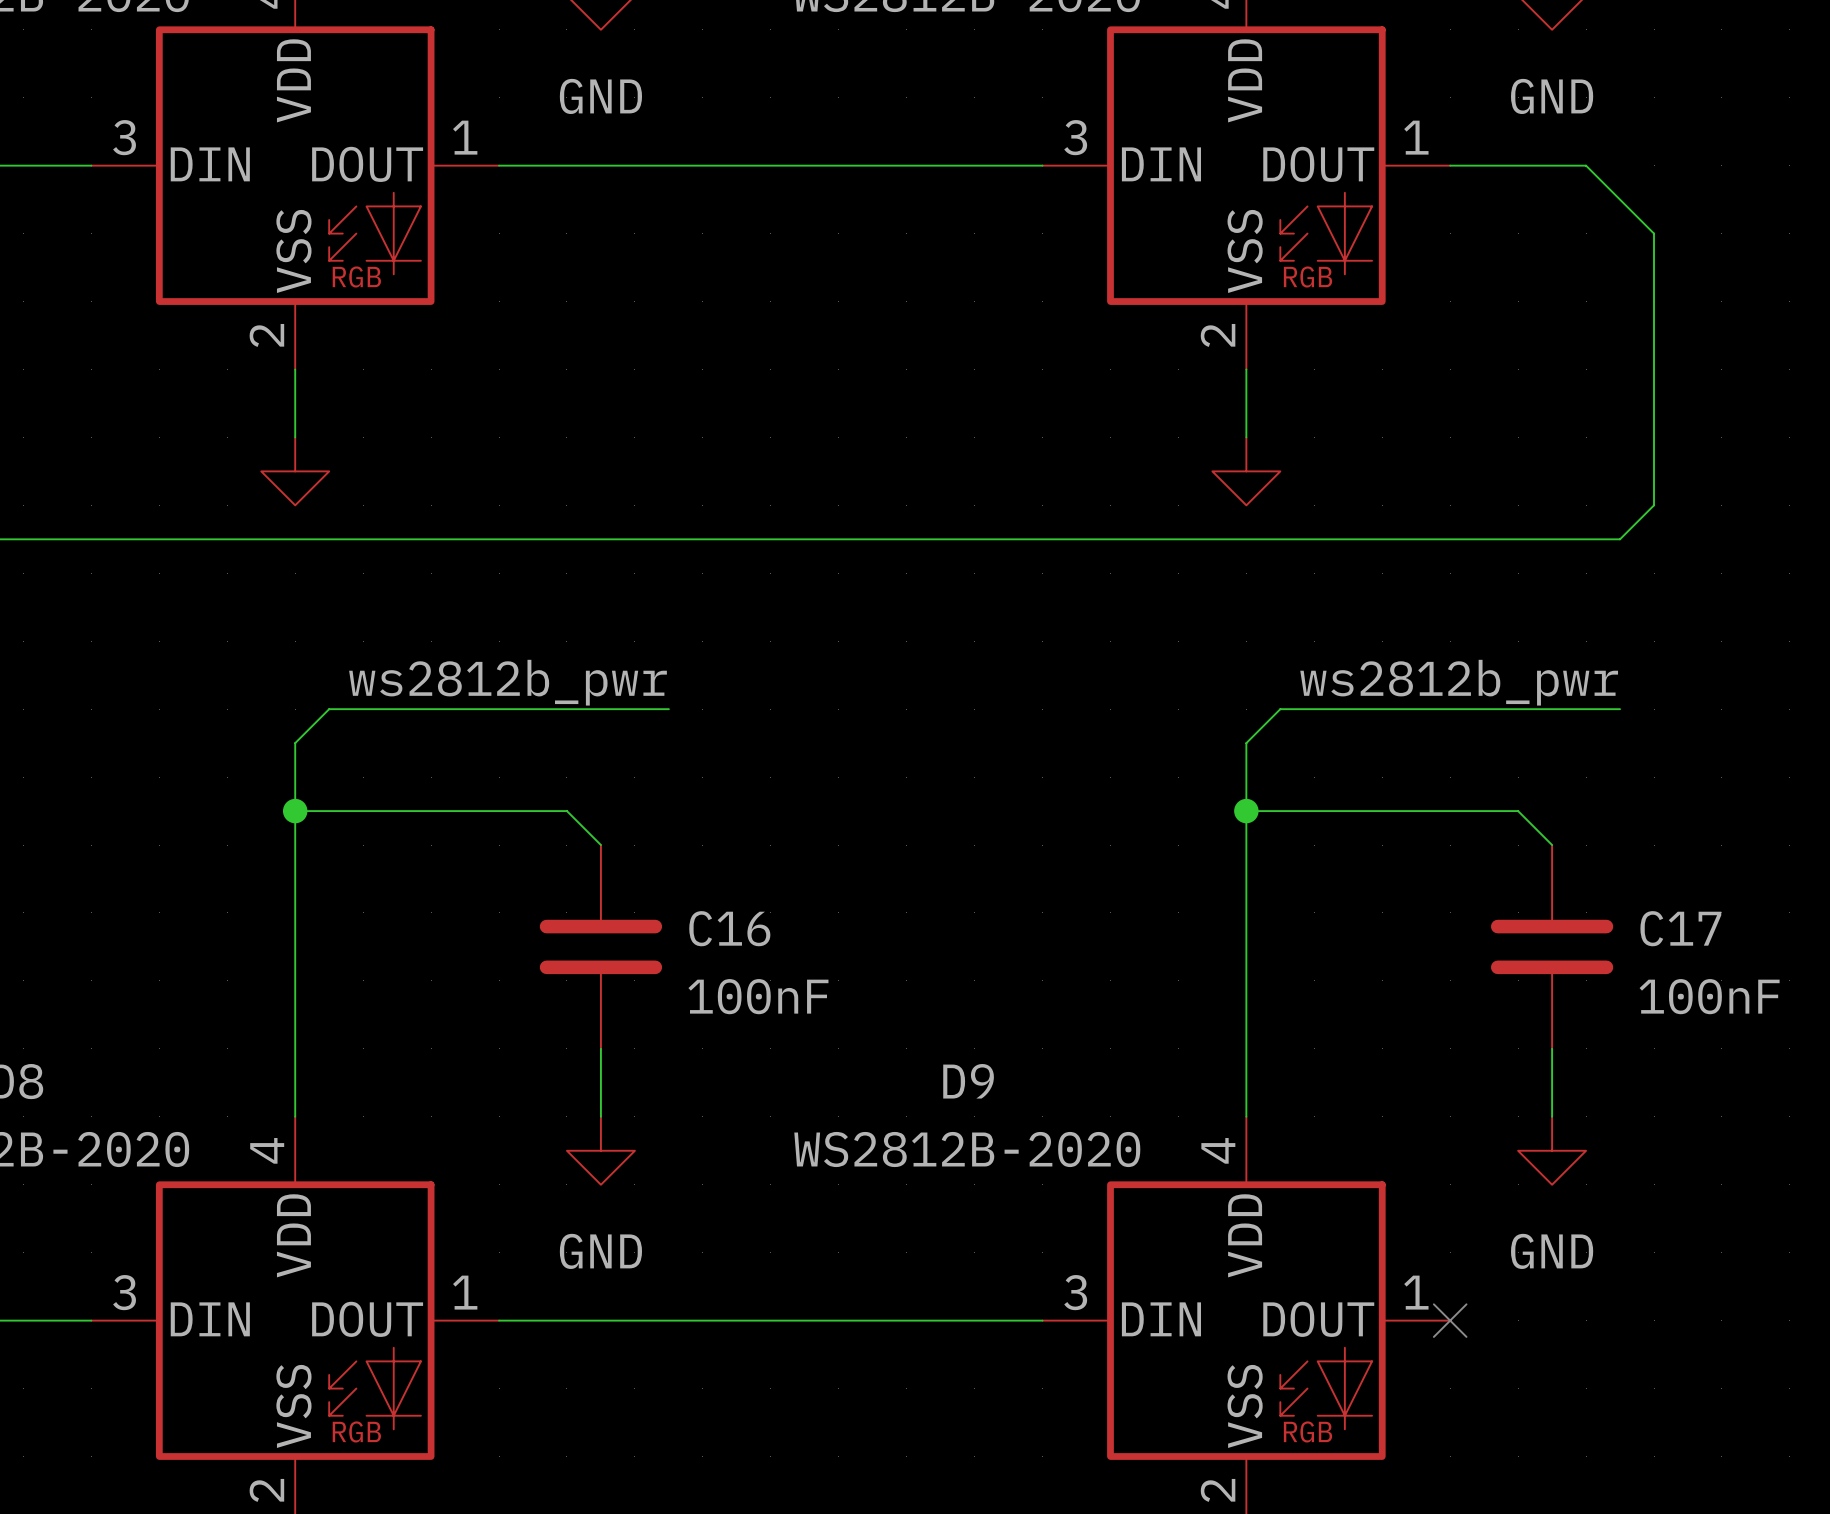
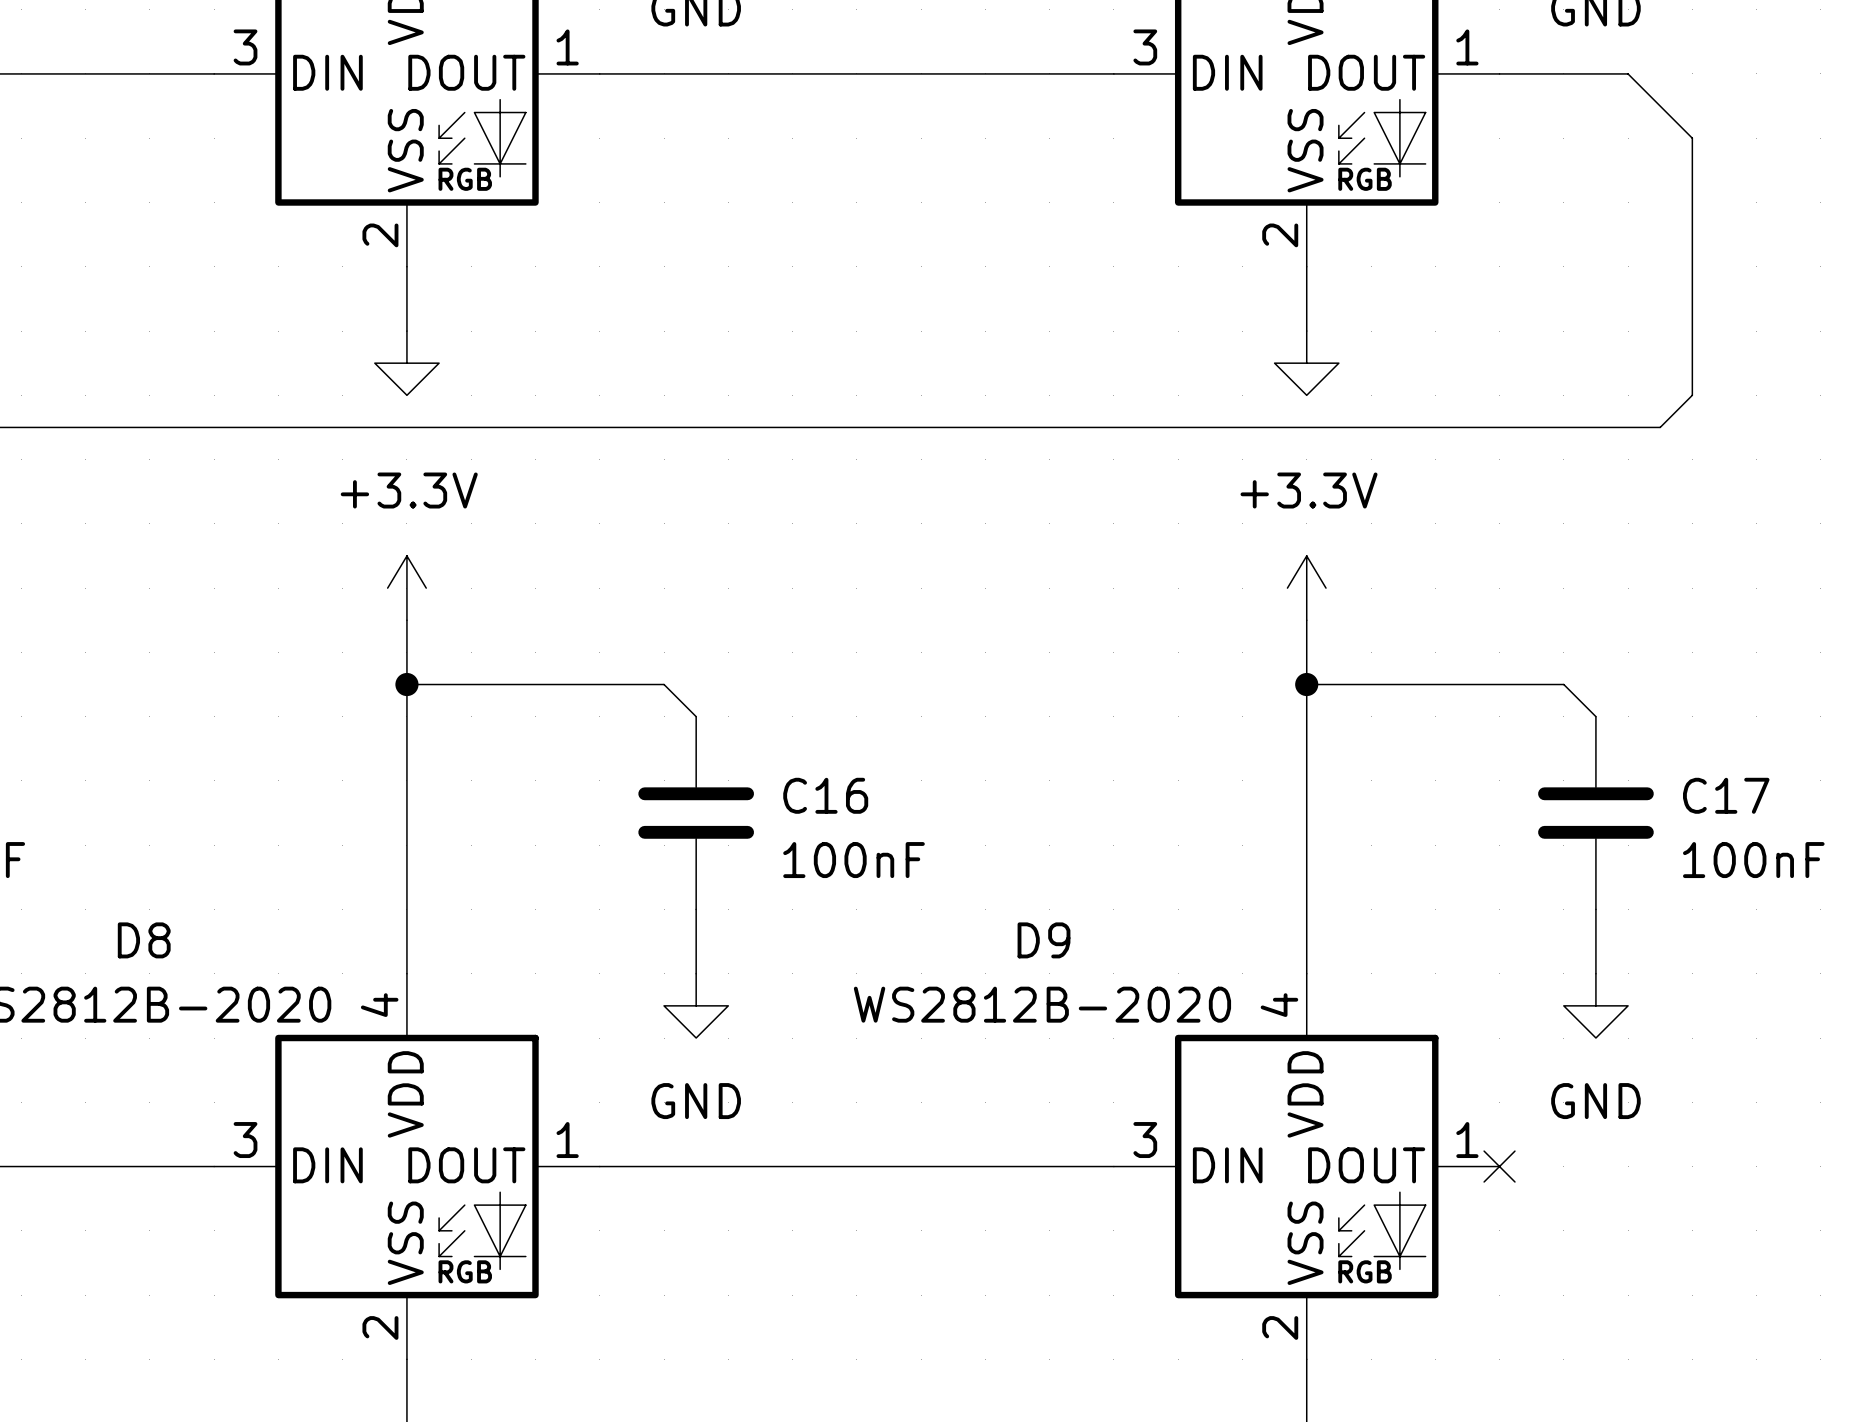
label: ws2812b_pwr (508, 682) -> none
label: ws2812b_pwr (1459, 682) -> none
power symbol: none -> +3.3V (406, 588)
wire: (668, 709) (329, 709) (295, 743) -> none
power symbol: none -> +3.3V (1306, 588)
wire: (1620, 709) (1280, 709) (1246, 743) -> none

